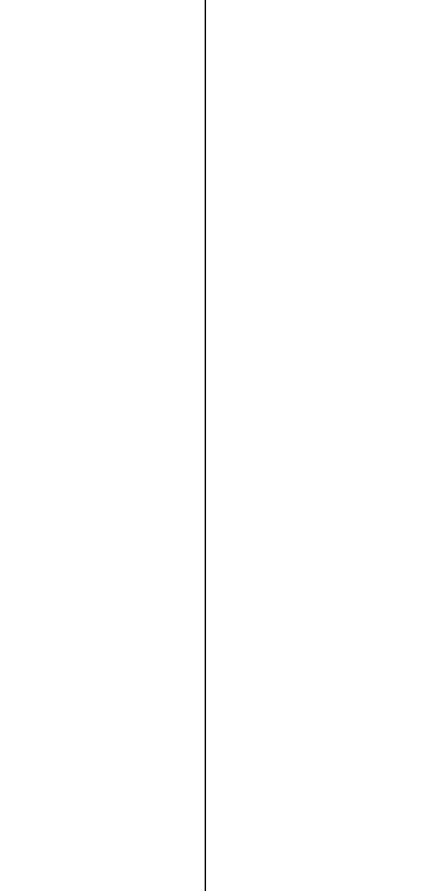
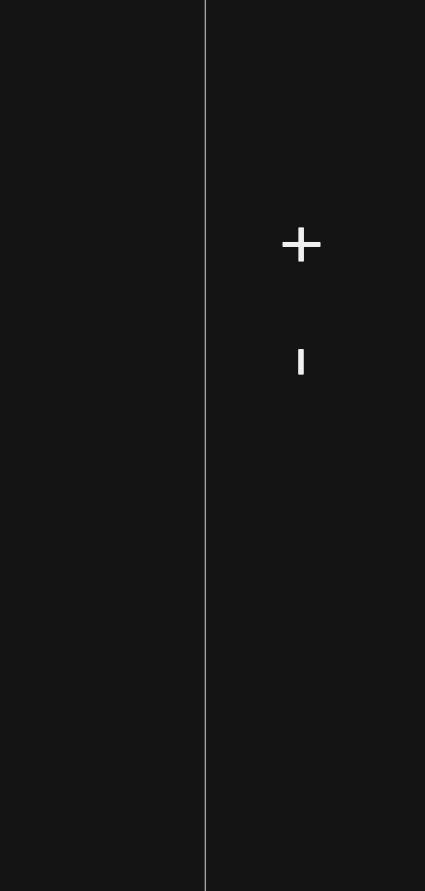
text: none -> + - (301, 301)

